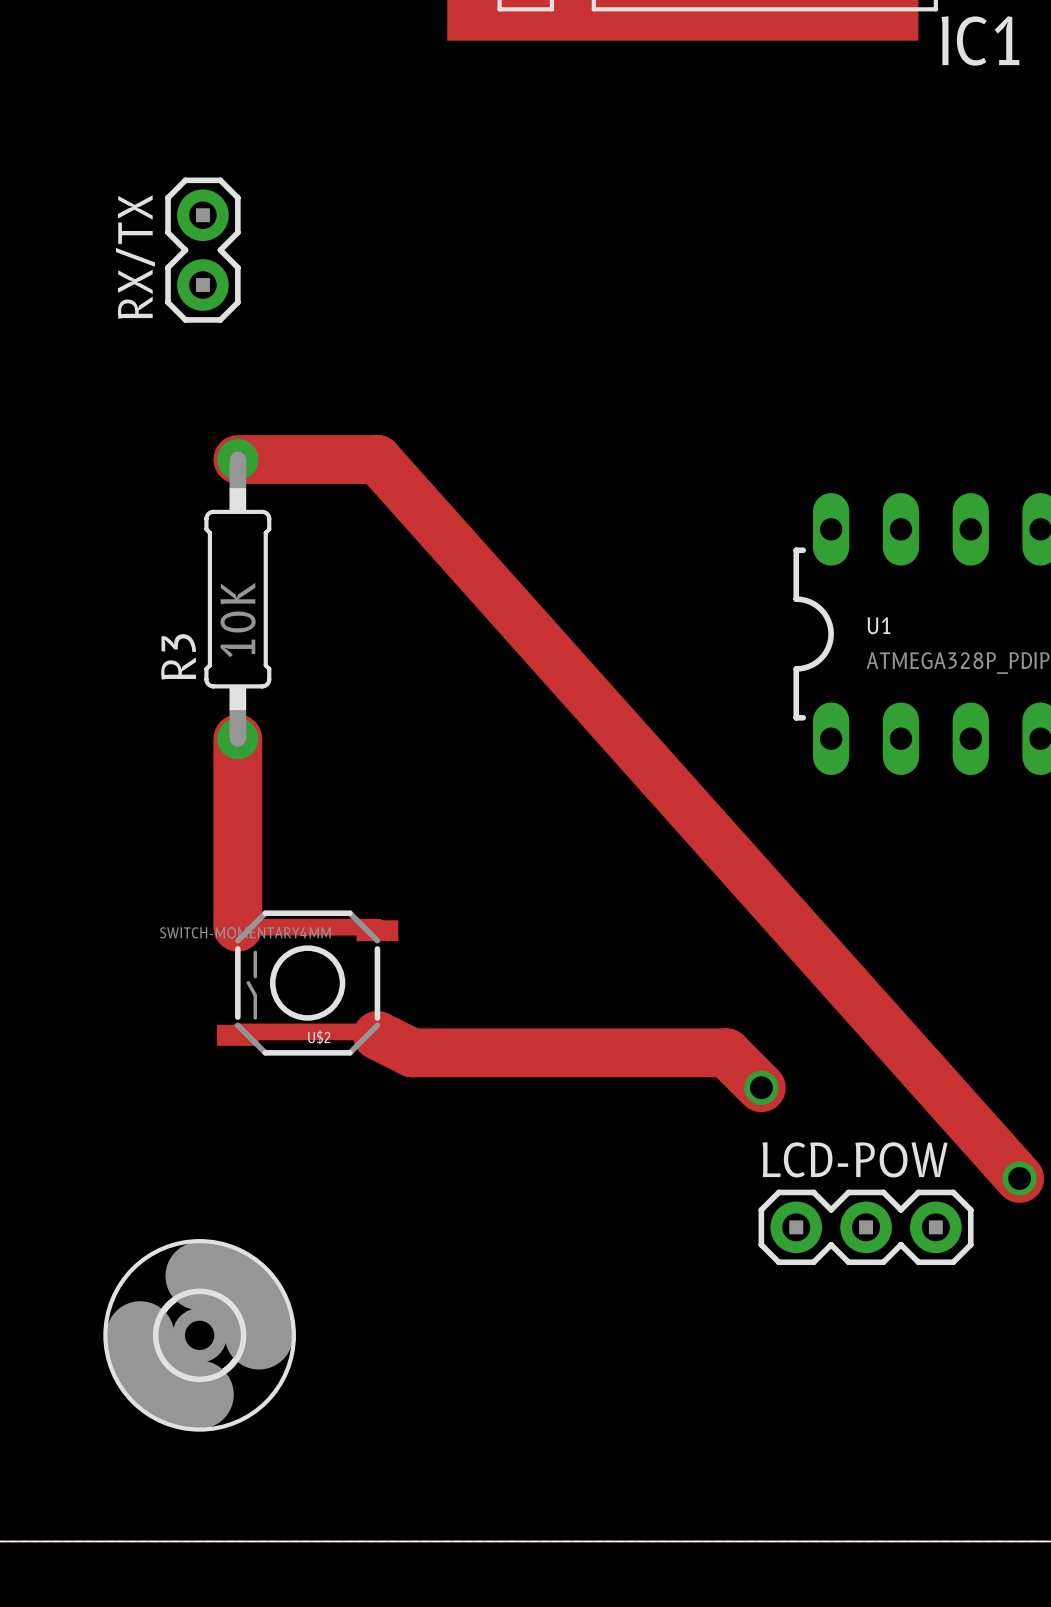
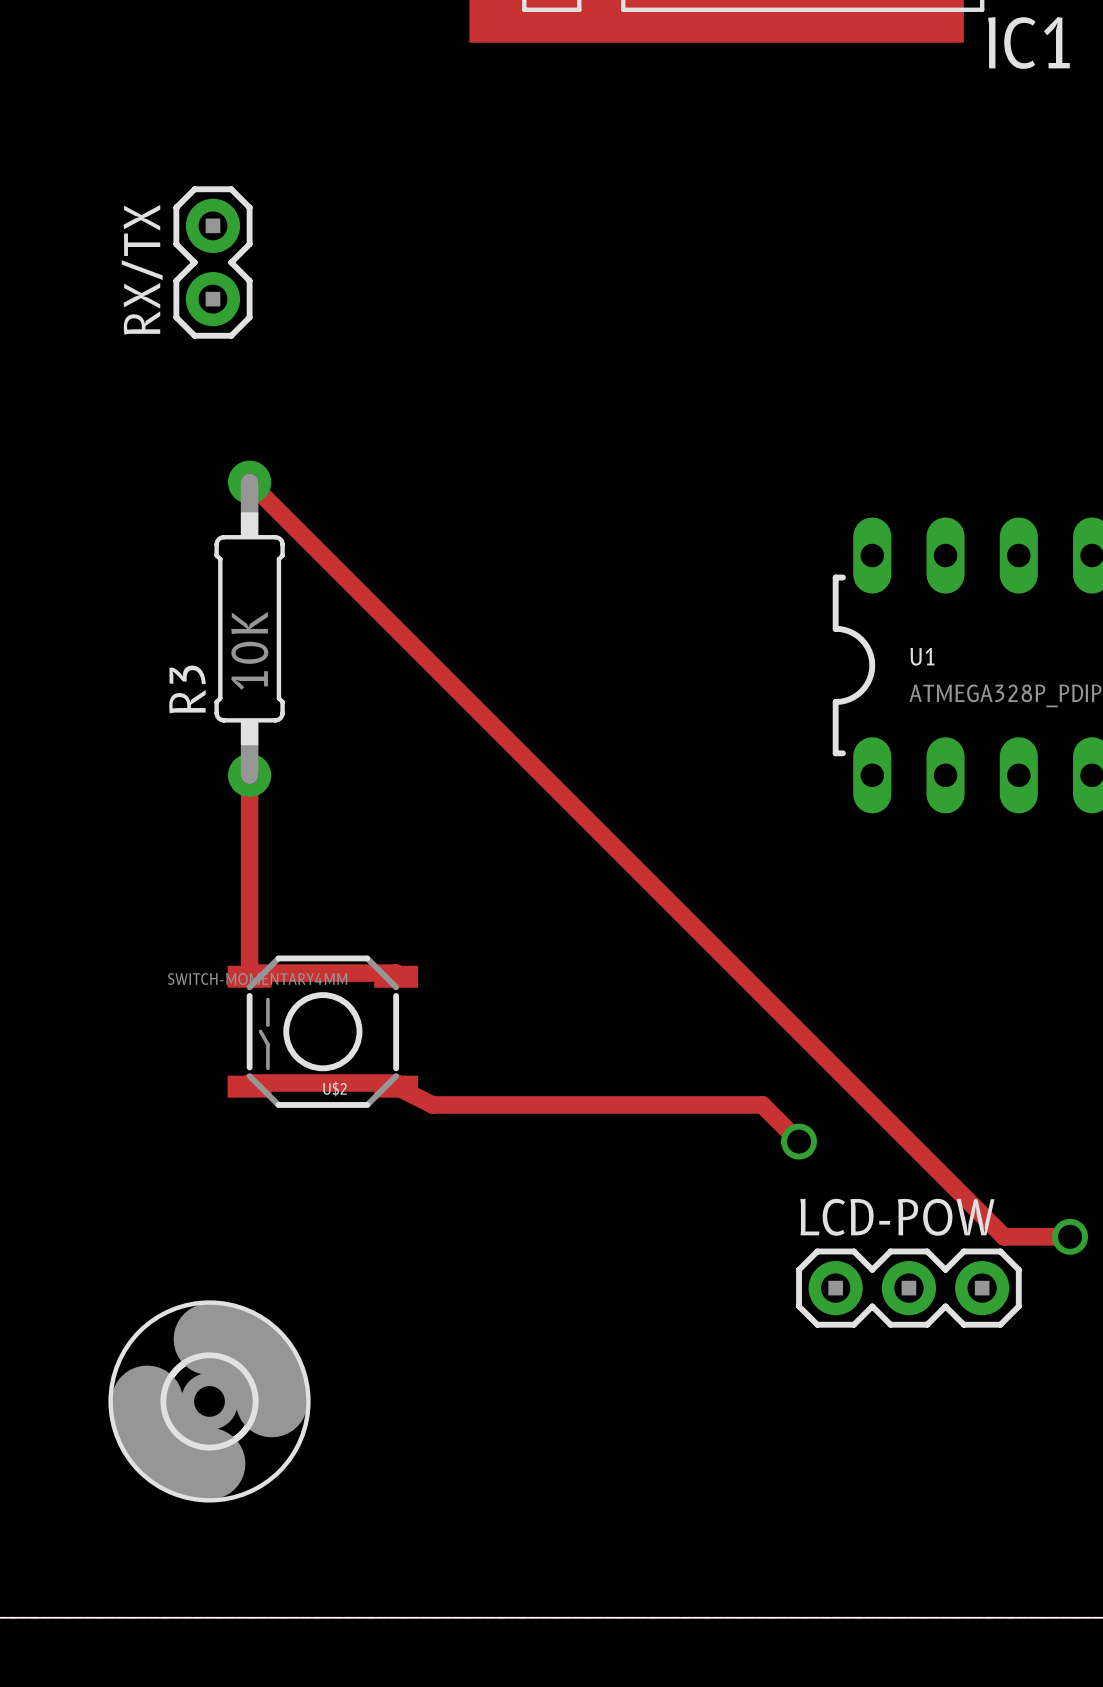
track: (237, 459) (377, 459) (1019, 1178) -> (249, 482) (1004, 1236) (1070, 1236)
track width: thick (237, 738) (237, 927) -> thin (249, 775) (249, 973)
track width: thick (377, 1035) (412, 1052) (726, 1052) (761, 1087) -> thin (396, 1086) (432, 1104) (762, 1104) (799, 1141)

